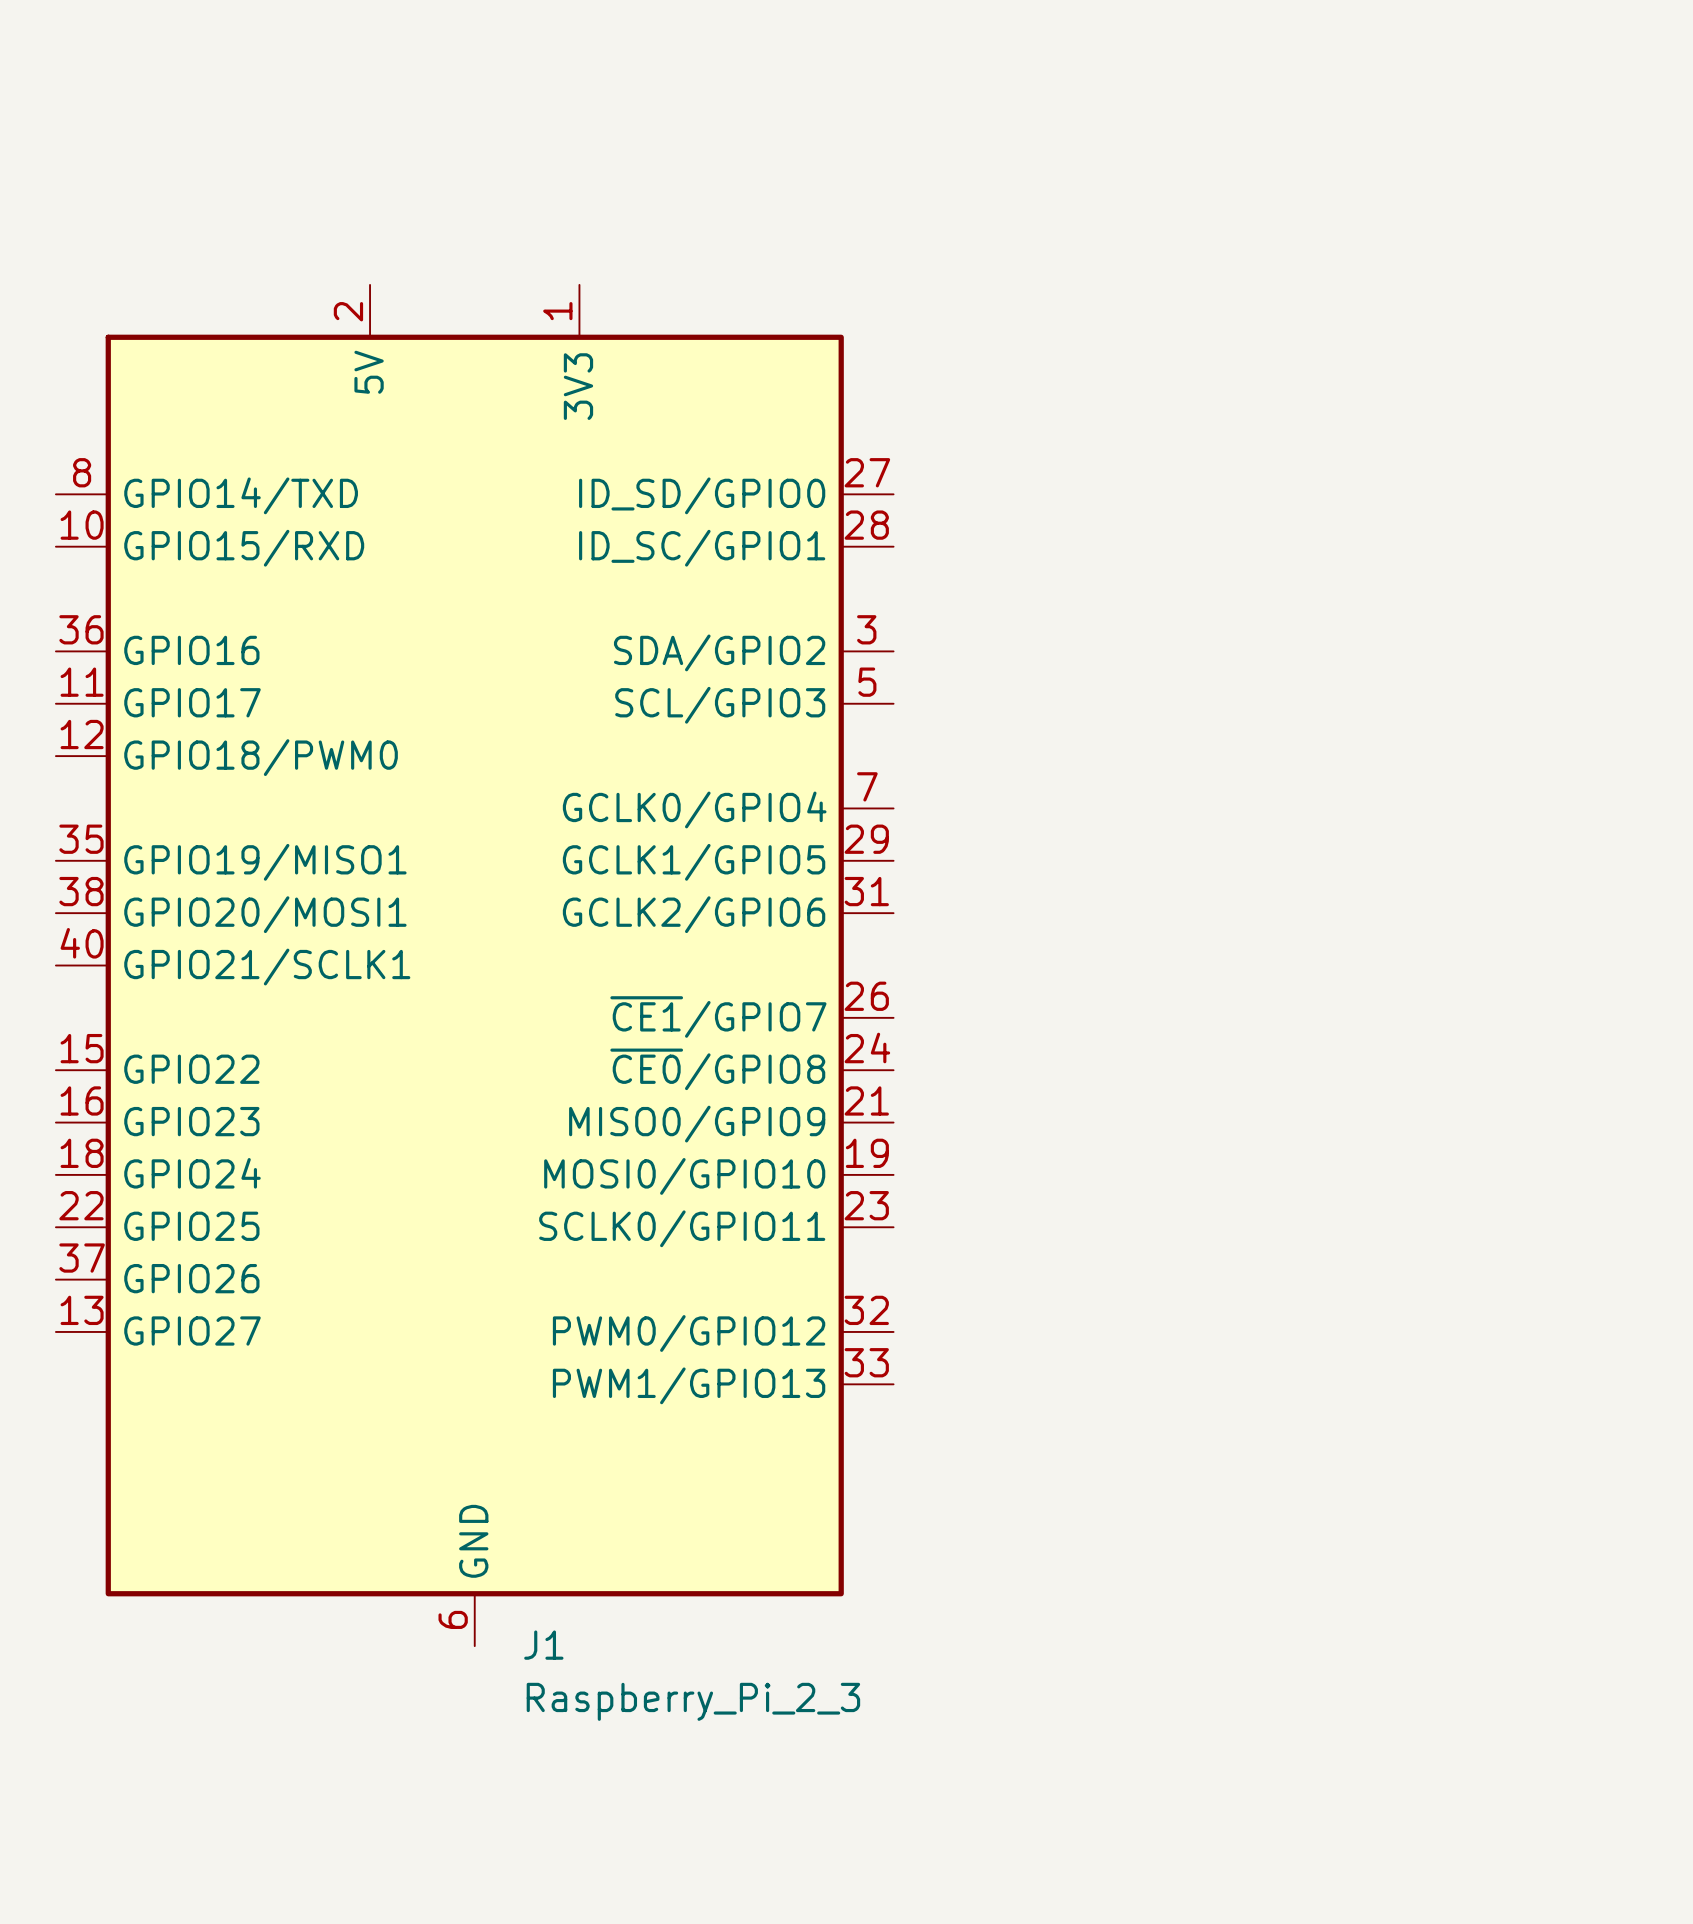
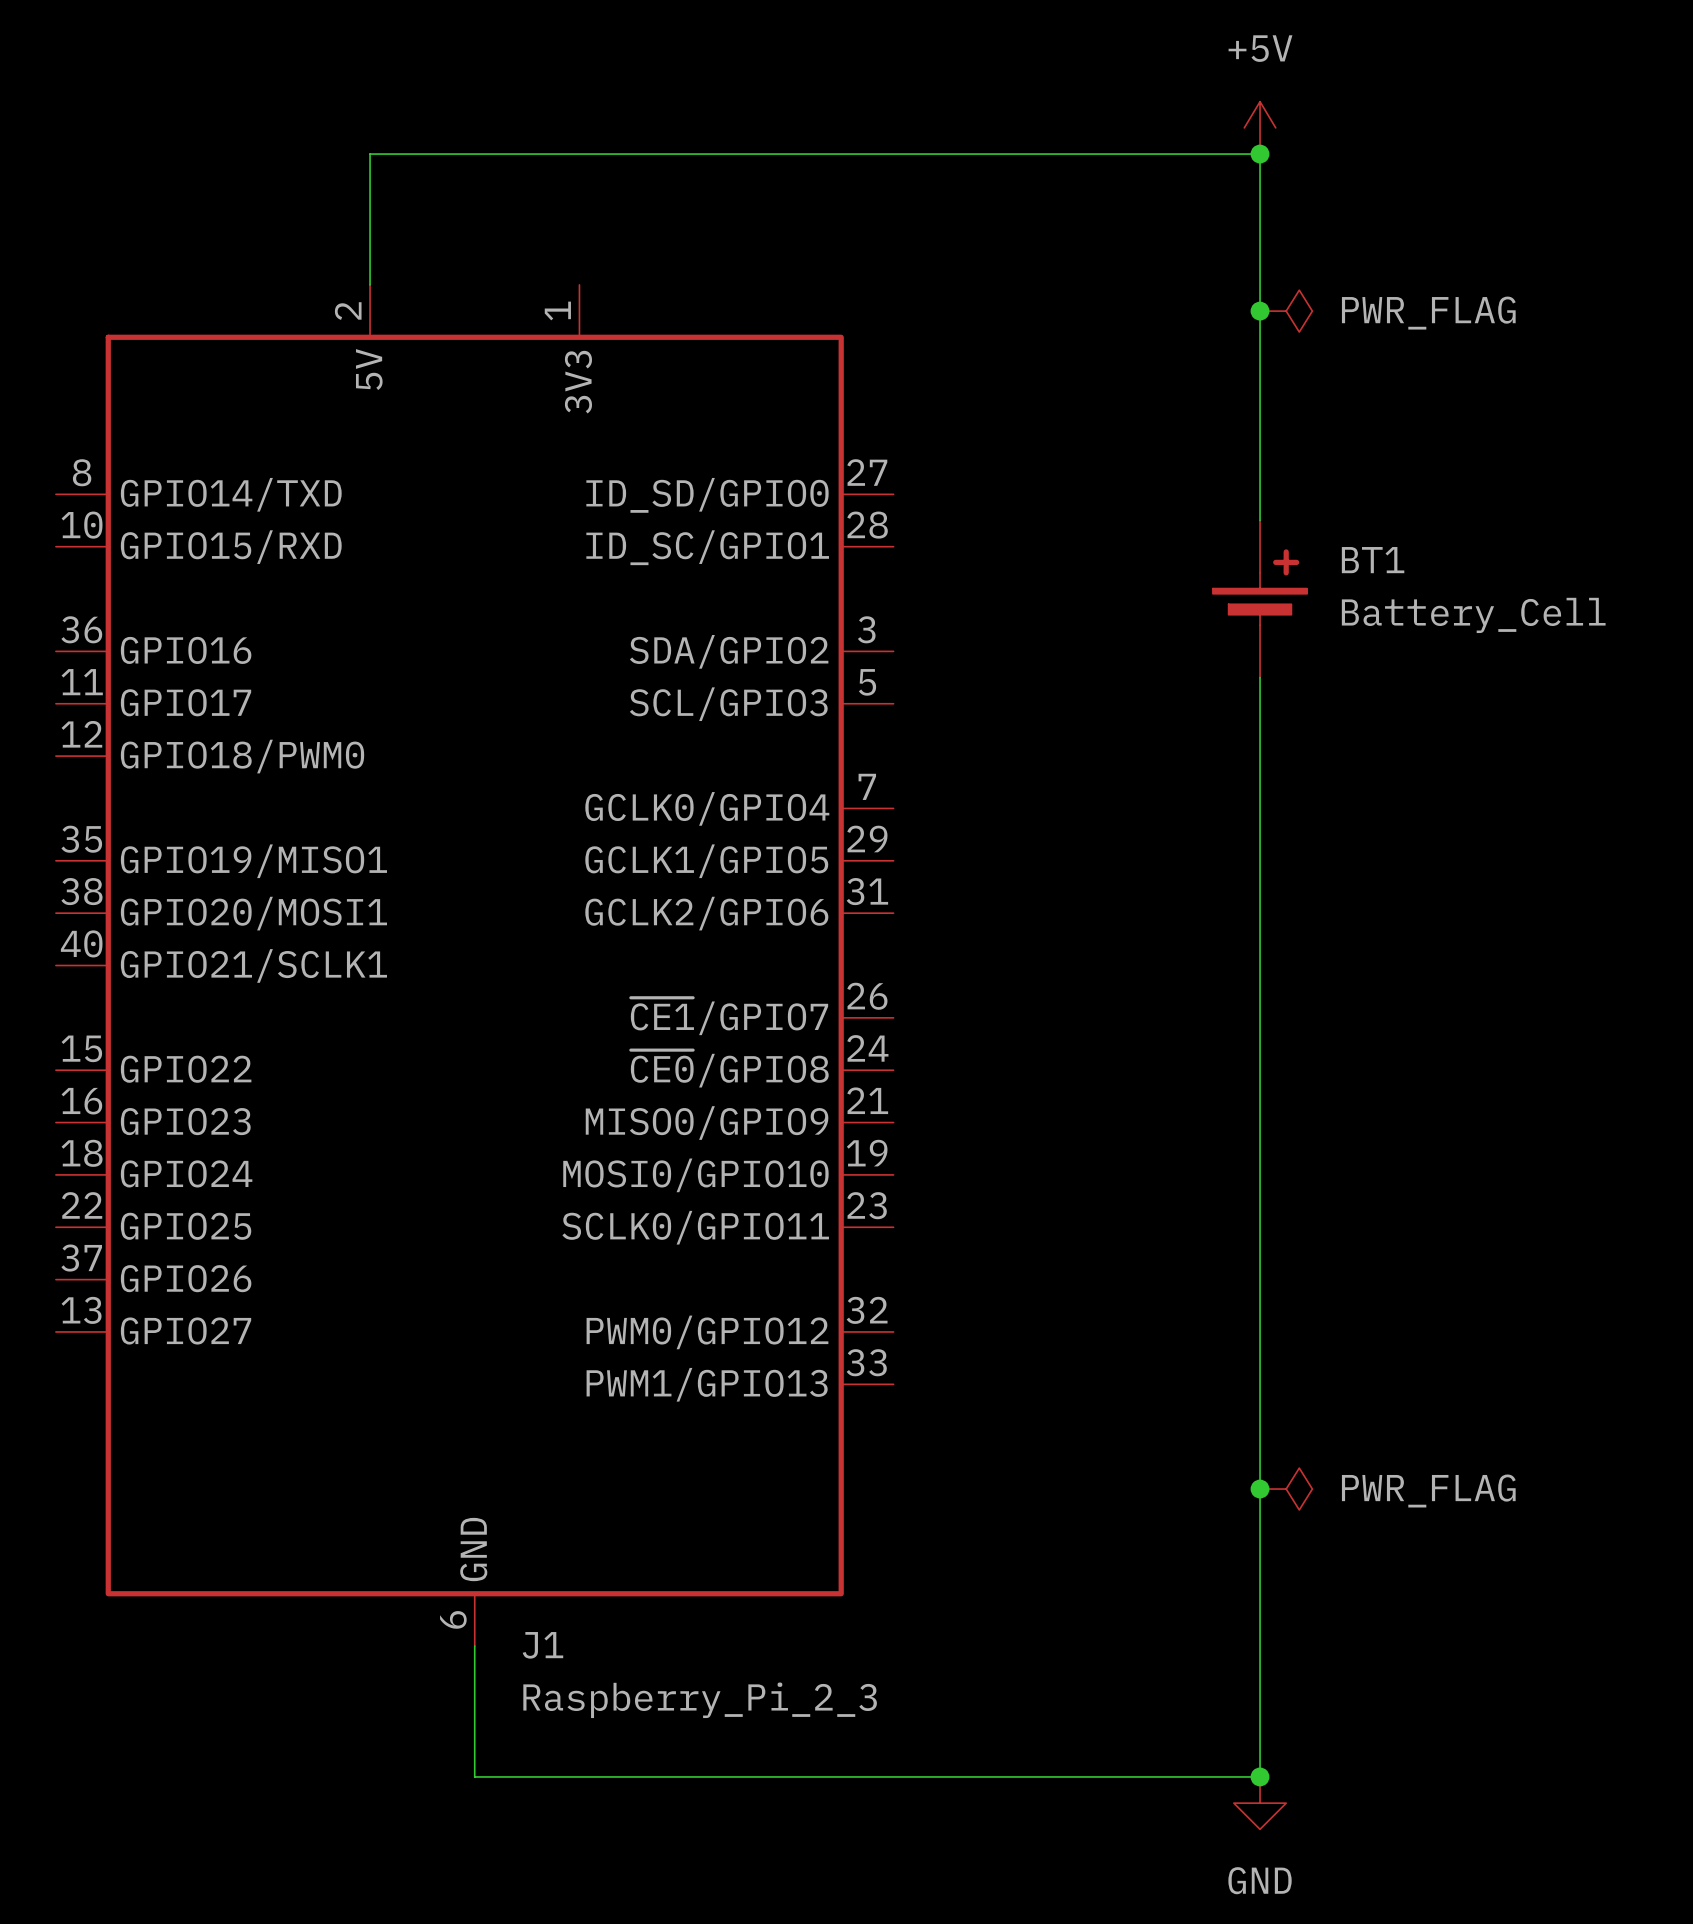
power symbol: none -> +5V (1260, 127)
junction: none -> (1260, 154)
wire: none -> (370, 284) (370, 154) (1260, 154) (1260, 520)
junction: none -> (1260, 311)
power symbol: none -> PWR_FLAG (1286, 311)
BT1: none -> Battery_Cell (1260, 599)
wire: none -> (1260, 677) (1260, 1776) (474, 1776) (474, 1646)
junction: none -> (1260, 1489)
power symbol: none -> PWR_FLAG (1286, 1489)
junction: none -> (1260, 1776)
power symbol: none -> GND (1260, 1803)

